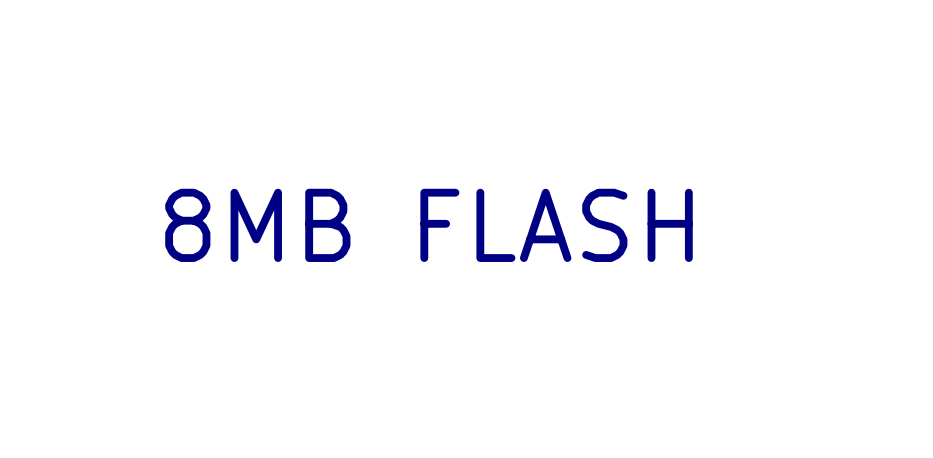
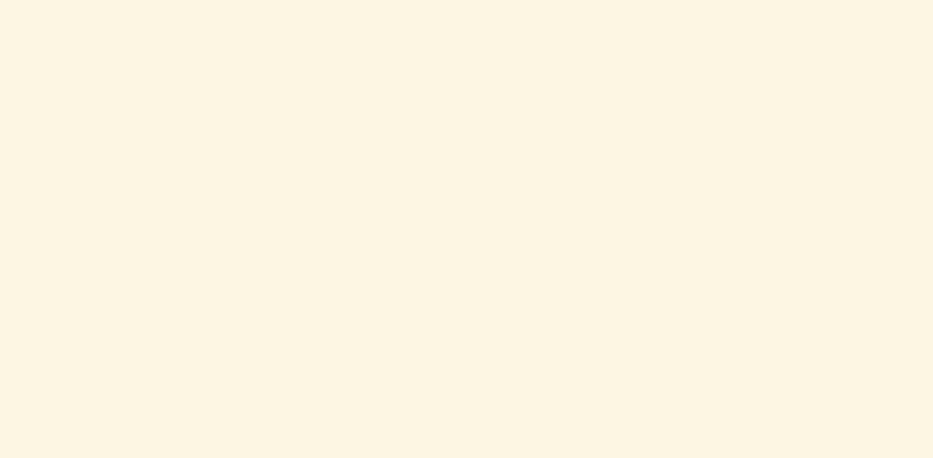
text: 8MB FLASH (428, 225) -> none

